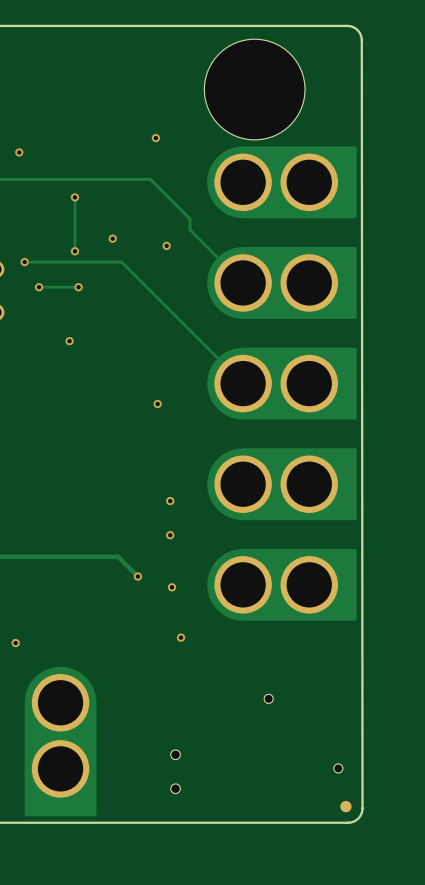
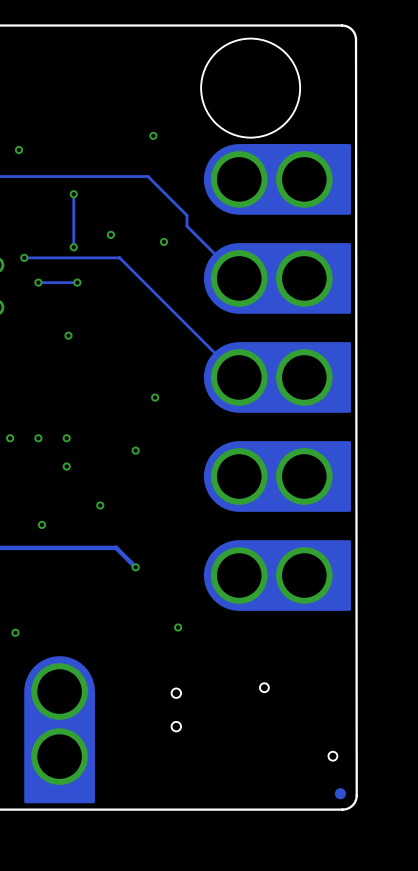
via: none -> (10, 438)
via: none -> (38, 438)
via: none -> (66, 438)
via: none -> (135, 450)
via: none -> (66, 466)
via: (170, 501) -> none
via: none -> (100, 505)
via: none -> (41, 524)
via: (170, 535) -> none
via: (172, 587) -> none
part position: (175, 771) -> (176, 709)

